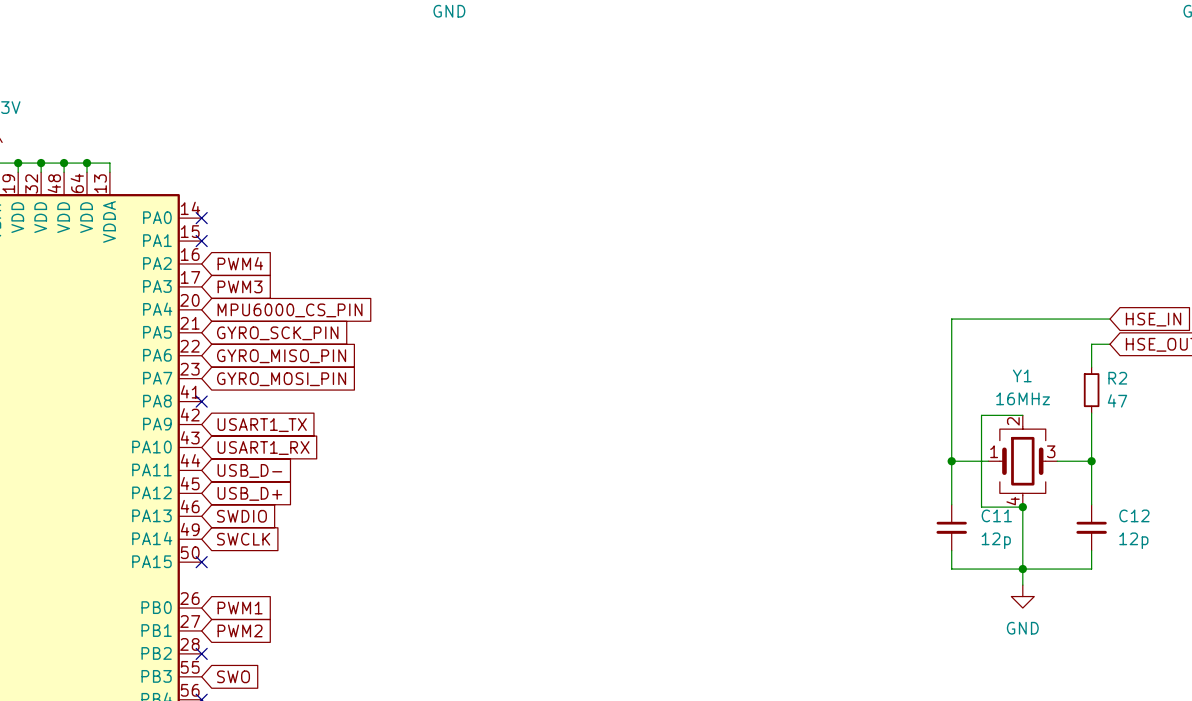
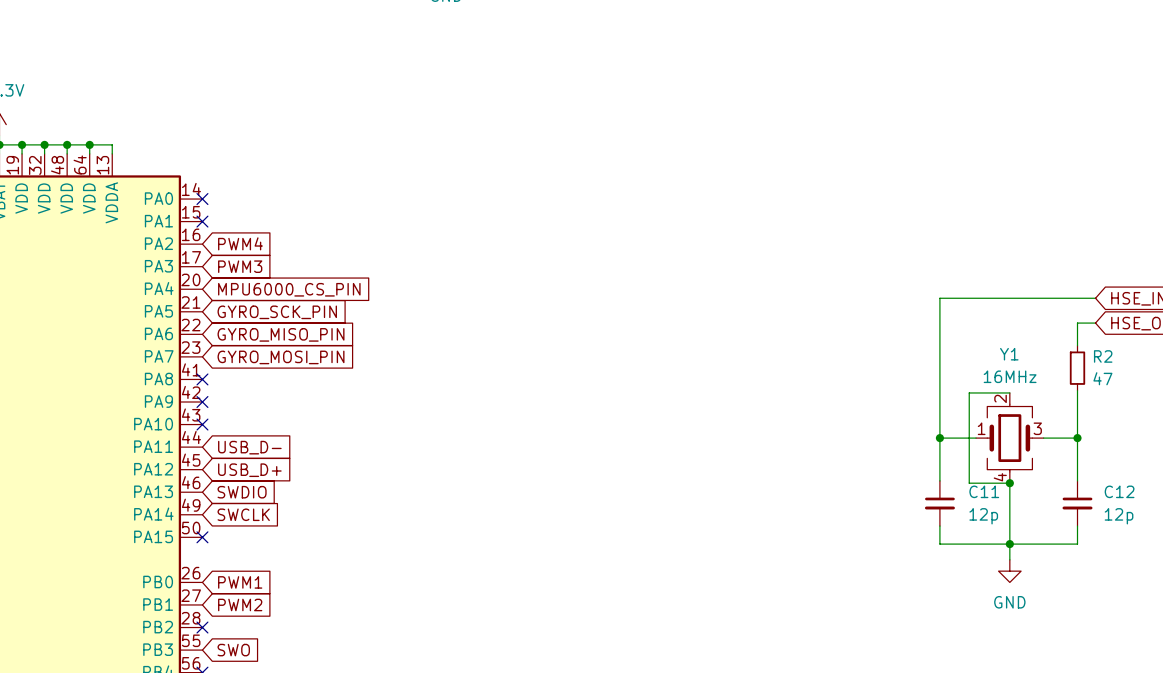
no-connect mark: none -> (202, 402)
global label: USART1_TX (262, 425) -> none
no-connect mark: none -> (202, 424)
global label: USART1_RX (263, 448) -> none

